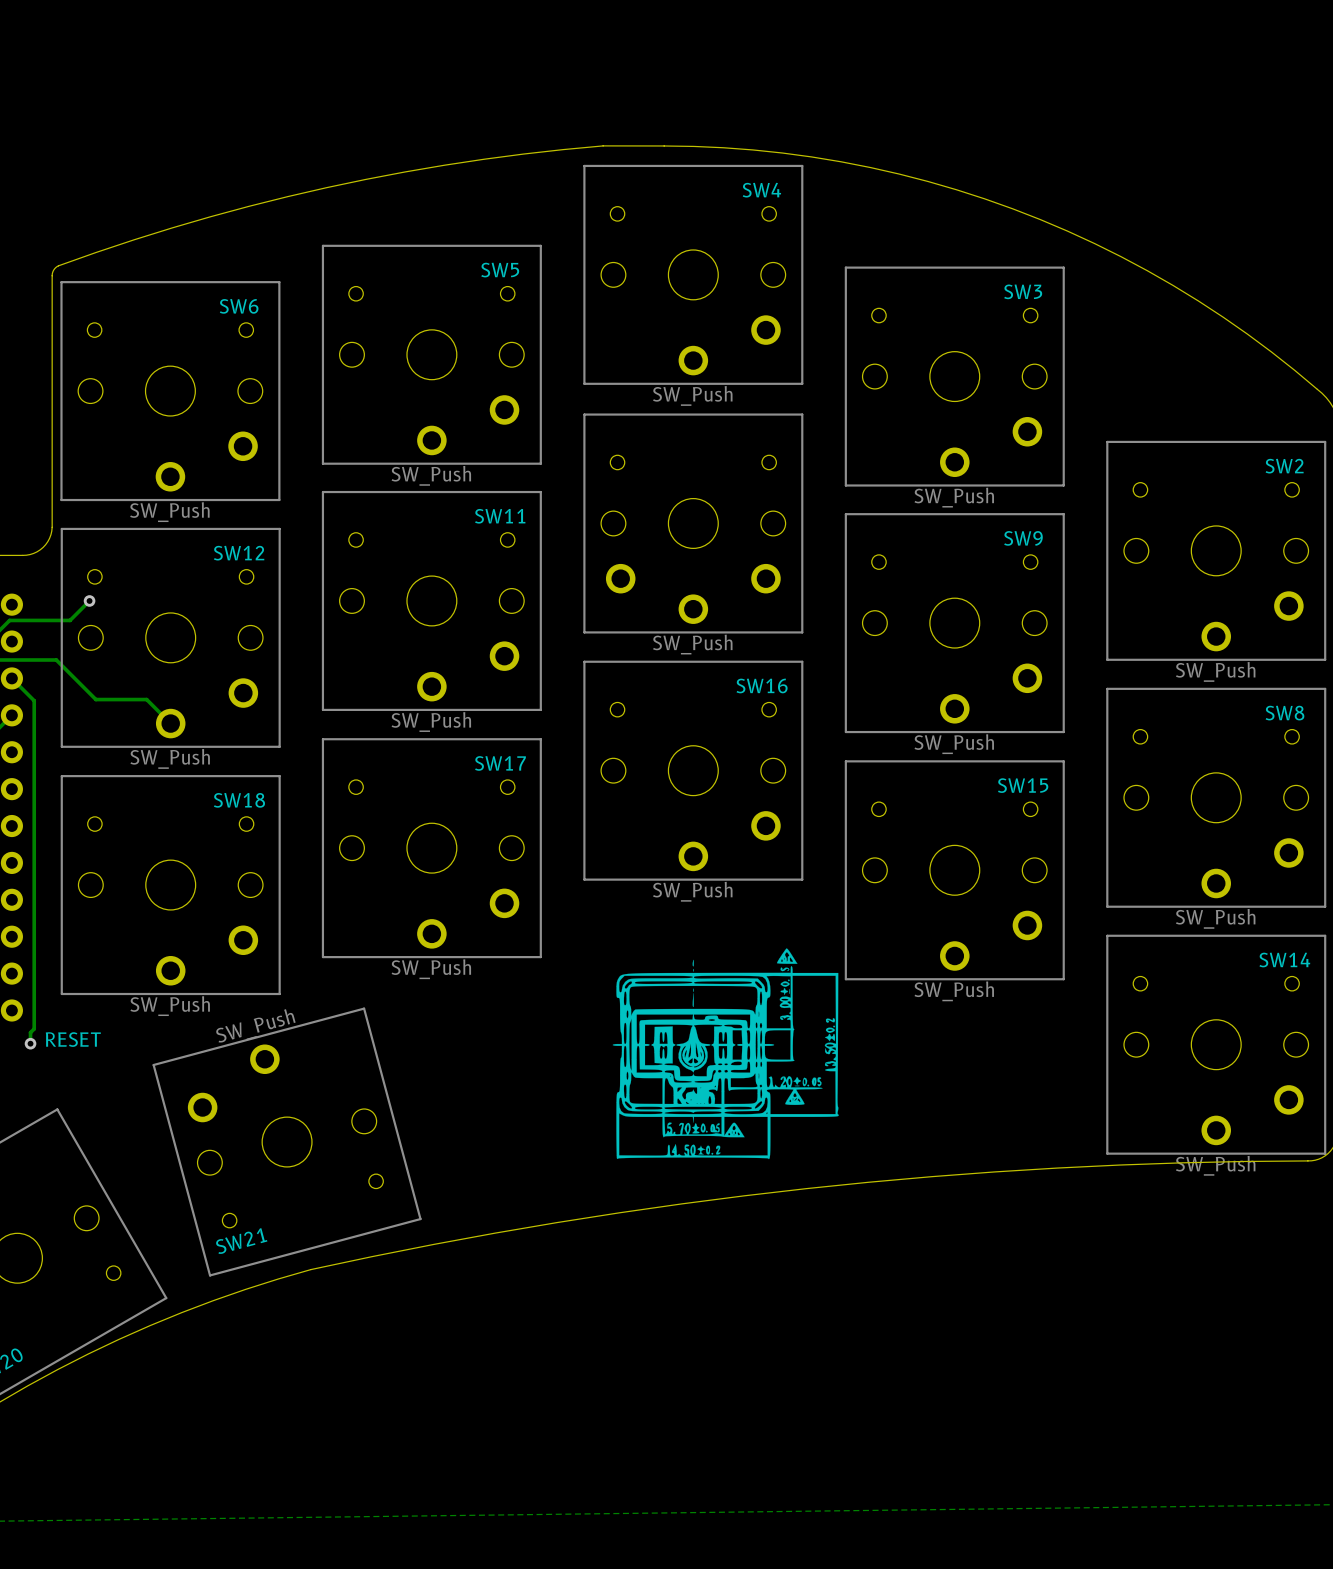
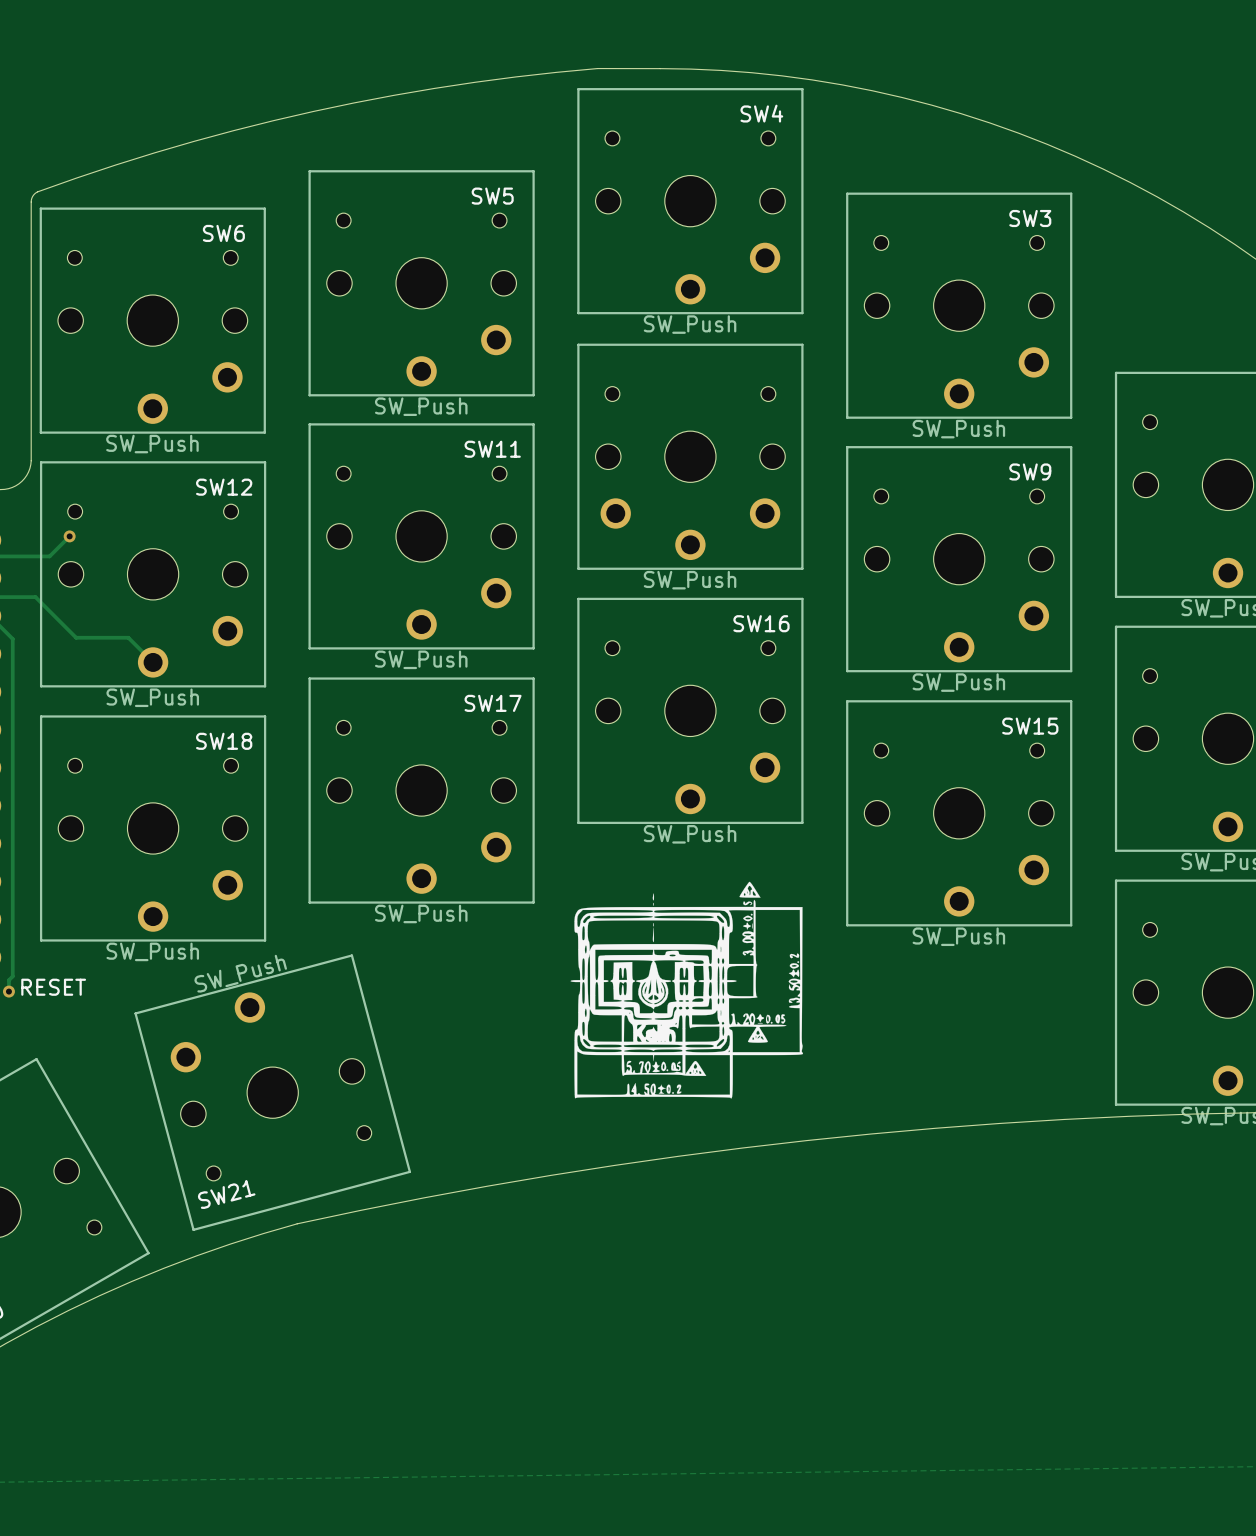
drawing position: (725, 1053) -> (686, 990)

